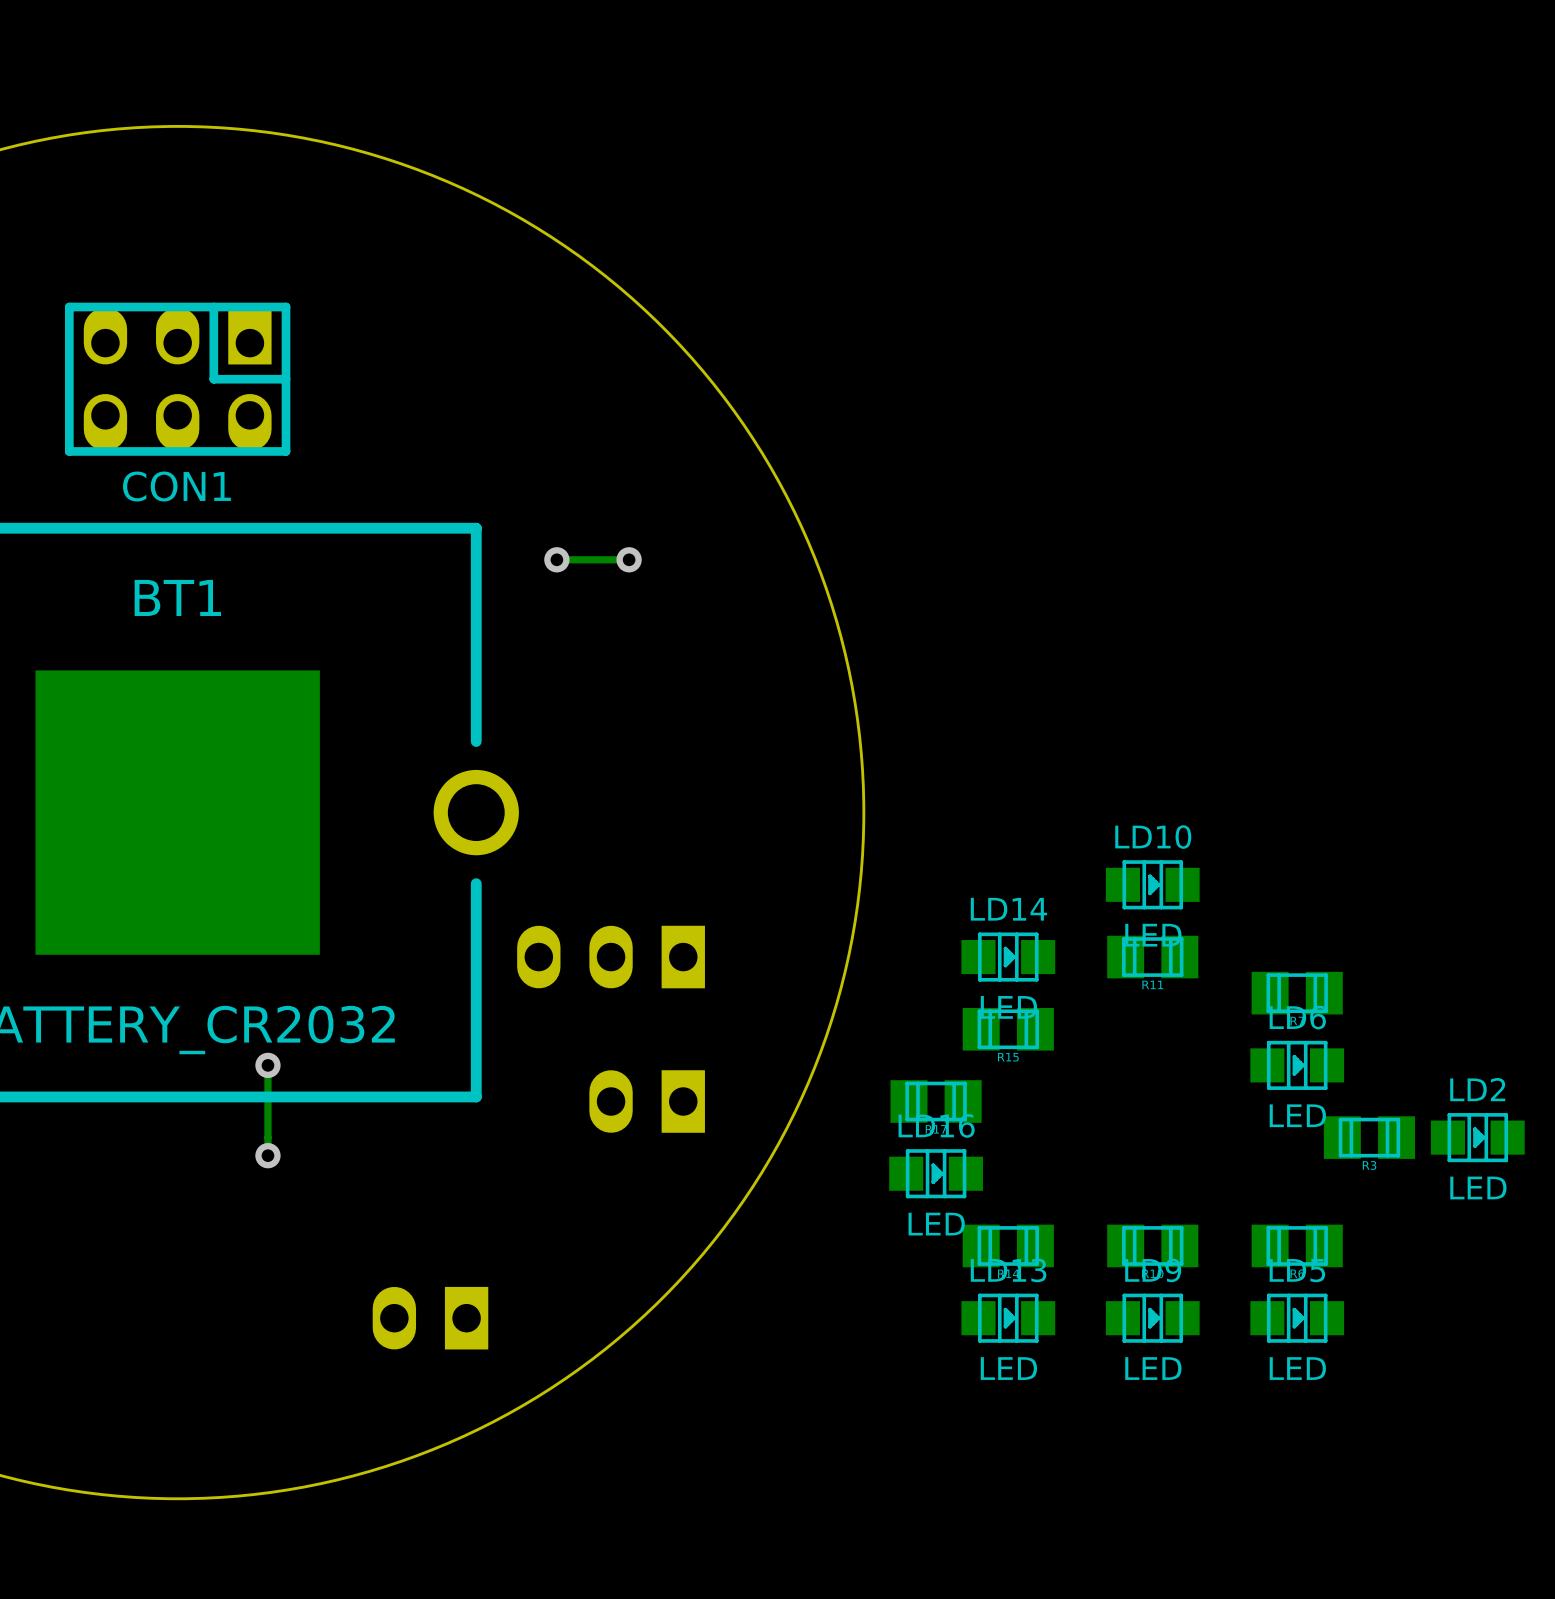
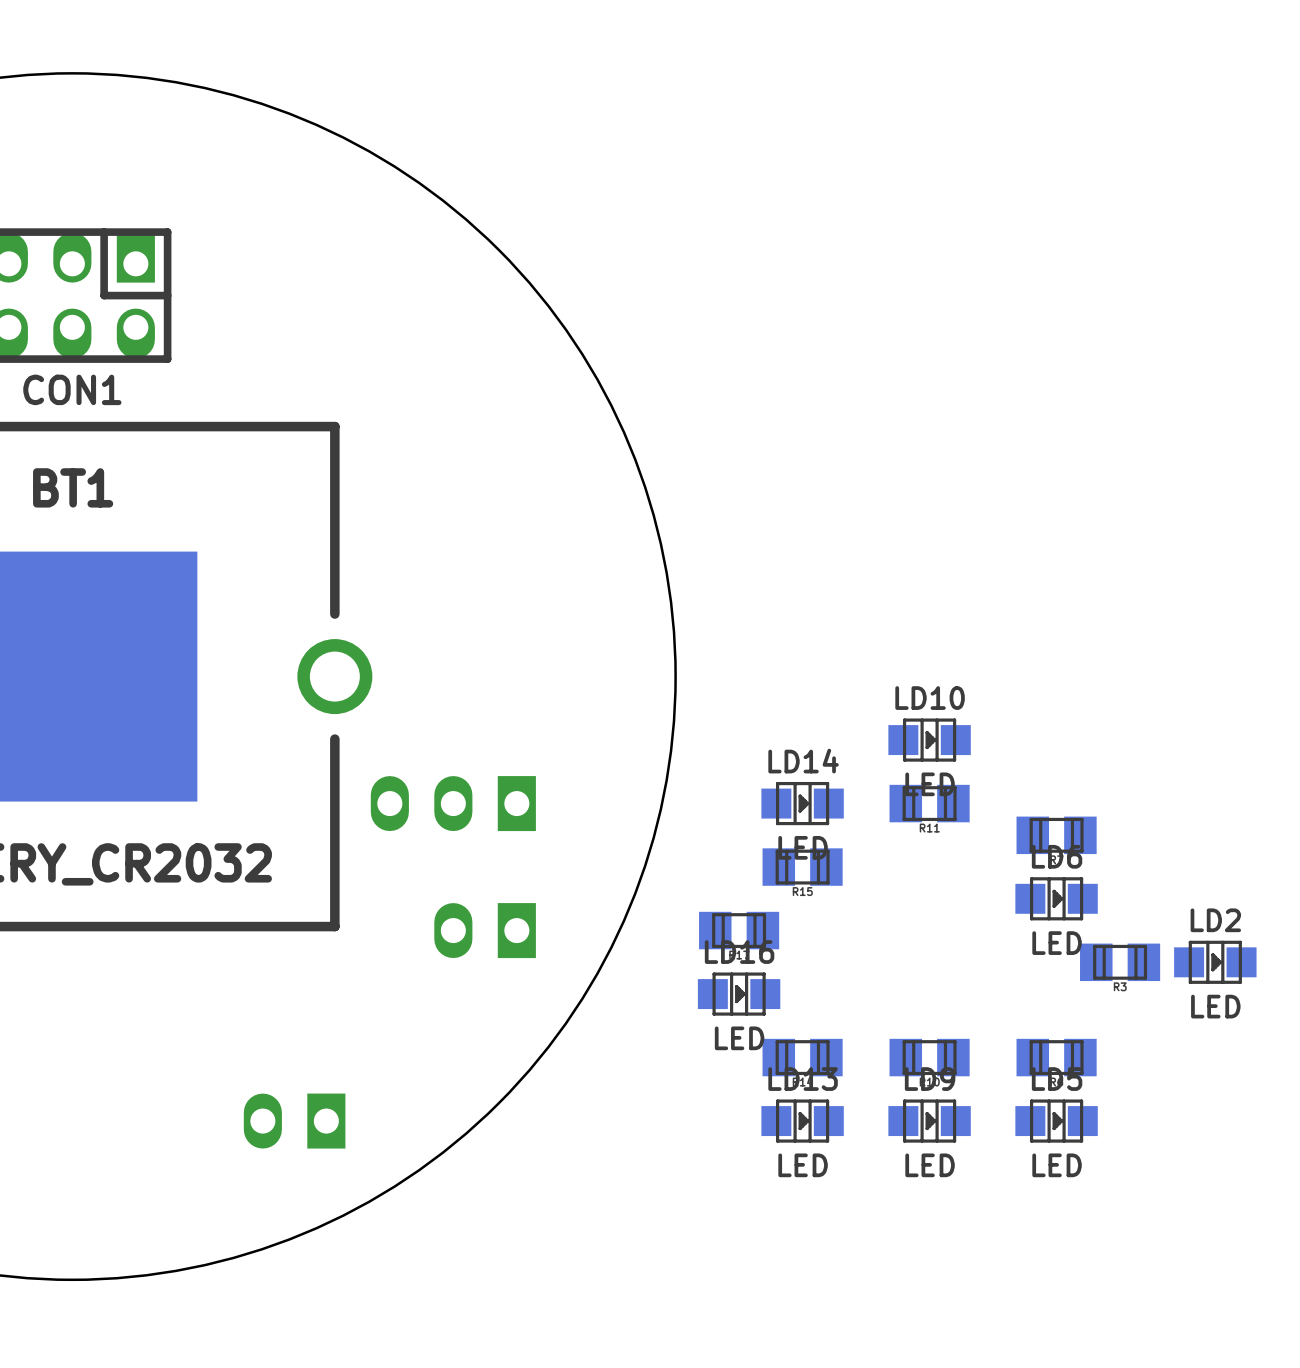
via: (556, 559) -> none
track: (629, 559) (556, 559) -> none
via: (629, 559) -> none
track: (267, 1065) (267, 1155) -> none
via: (267, 1065) -> none
via: (267, 1155) -> none

